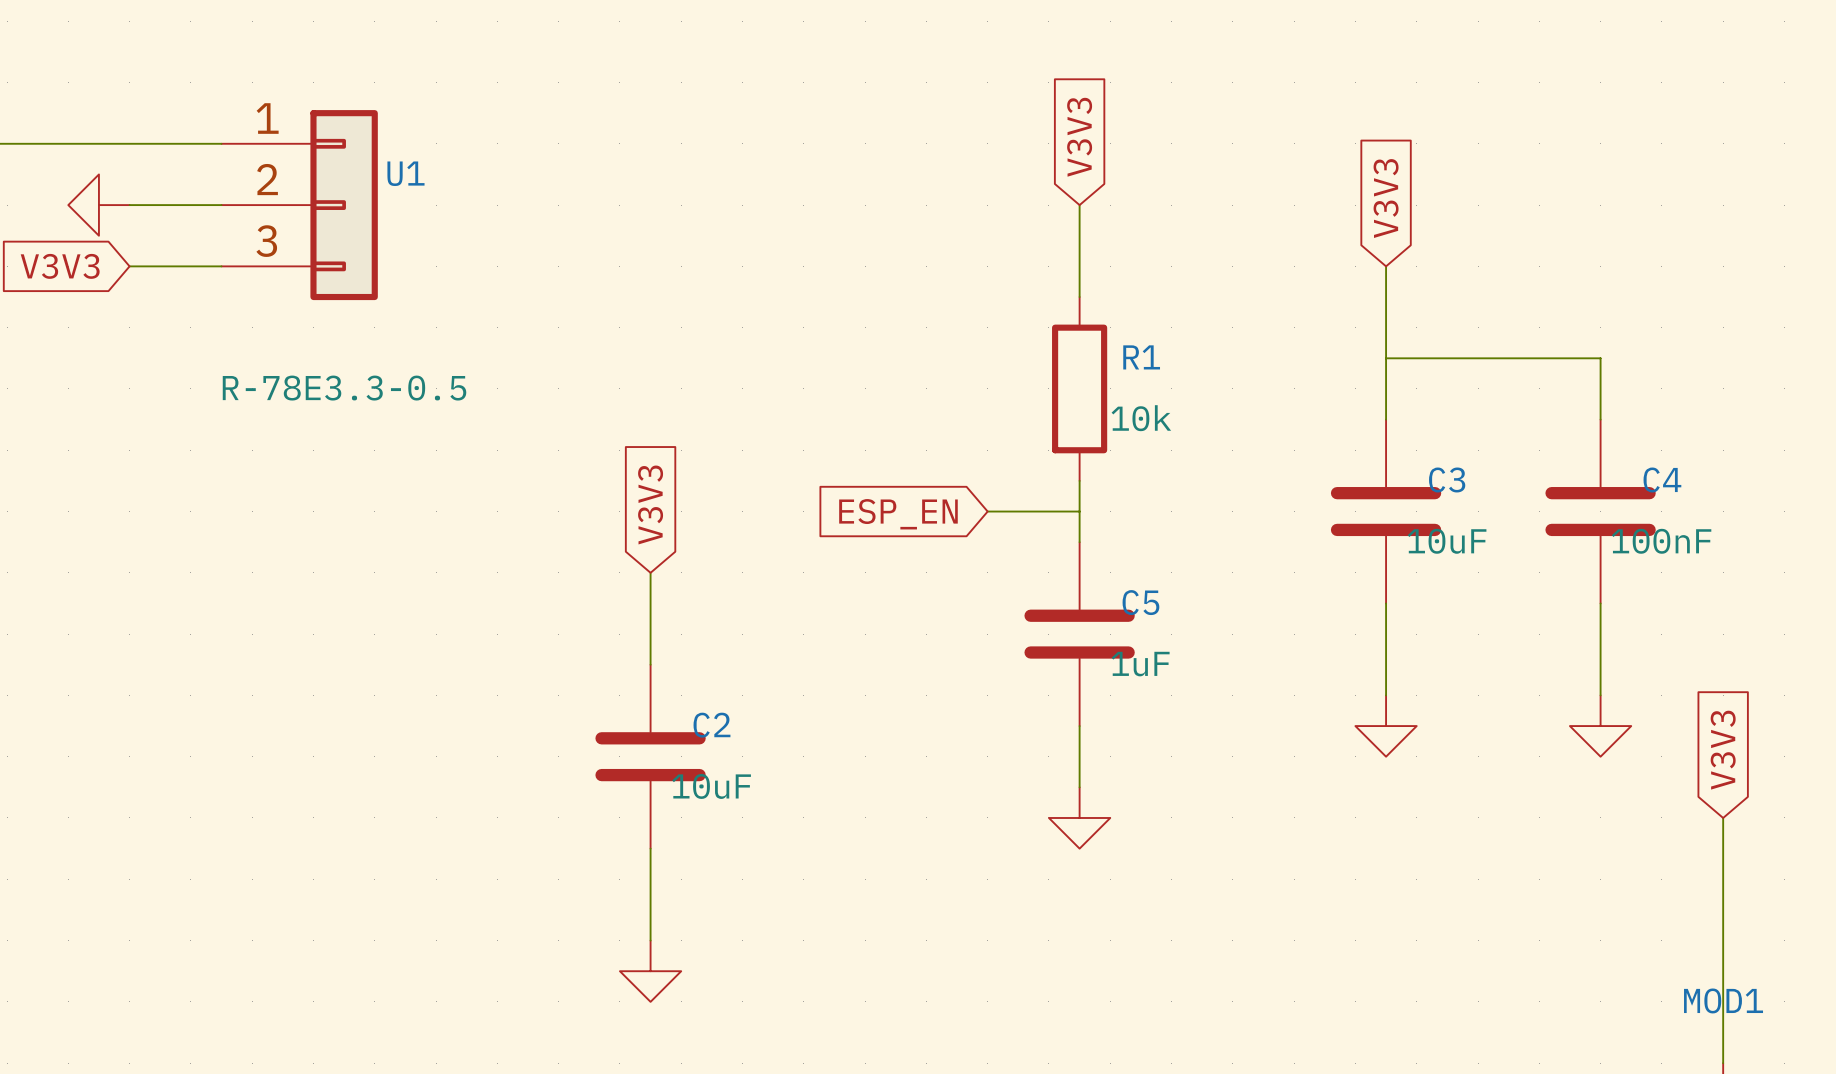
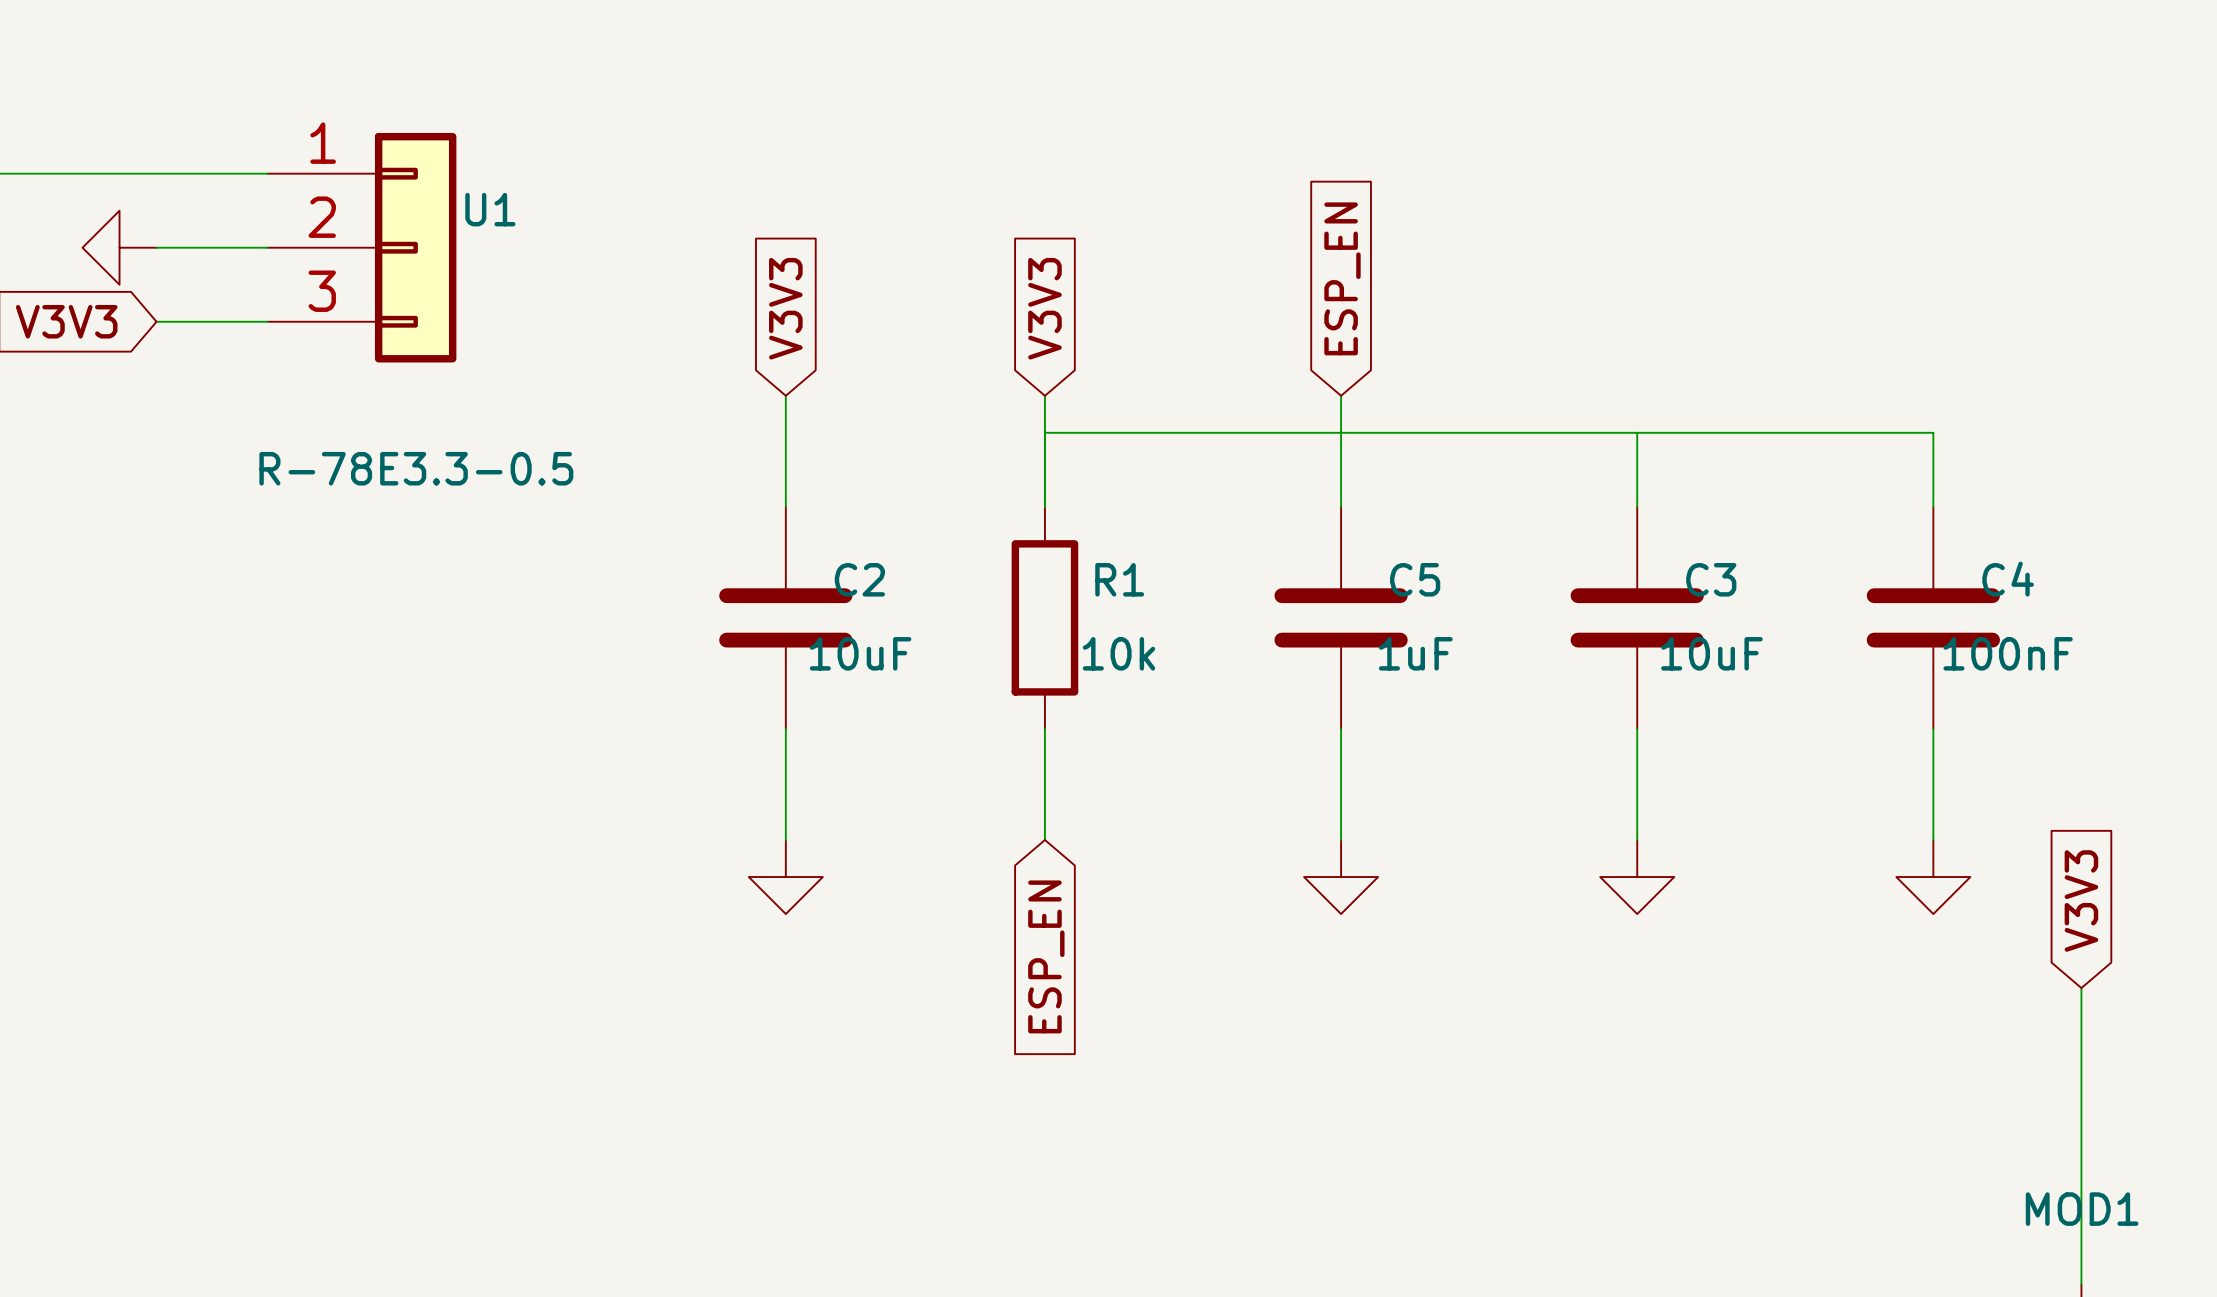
global label: V3V3 (1079, 137) -> none
global label: V3V3 (1386, 198) -> none
wire: (1079, 205) (1079, 297) -> (1341, 395) (1341, 506)
global label: none -> ESP_EN (1342, 278)
global label: none -> V3V3 (785, 308)
global label: none -> V3V3 (1044, 308)
wire: (1386, 266) (1386, 419) -> none
wire: none -> (785, 395) (785, 506)
wire: none -> (1044, 395) (1044, 506)
wire: none -> (1044, 432) (1674, 432)
R1 position: (1079, 388) -> (1044, 617)
wire: (1079, 480) (1079, 542) -> (1637, 432) (1637, 506)
global label: V3V3 (650, 504) -> none
wire: (987, 511) (1079, 511) -> none
C3 position: (1386, 511) -> (1637, 617)
global label: ESP_EN (898, 514) -> none
wire: none -> (1341, 728) (1341, 839)
wire: (1386, 603) (1386, 695) -> (1637, 728) (1637, 839)
C5 position: (1079, 634) -> (1341, 617)
power symbol: none -> (785, 877)
wire: (1079, 726) (1079, 787) -> none
power symbol position: (1386, 726) -> (1637, 877)
C2 position: (650, 756) -> (785, 617)
global label: none -> ESP_EN (1046, 956)
power symbol position: (1079, 817) -> (1341, 877)
wire: (650, 848) (650, 940) -> (1044, 728) (1044, 839)
power symbol: (650, 971) -> none

